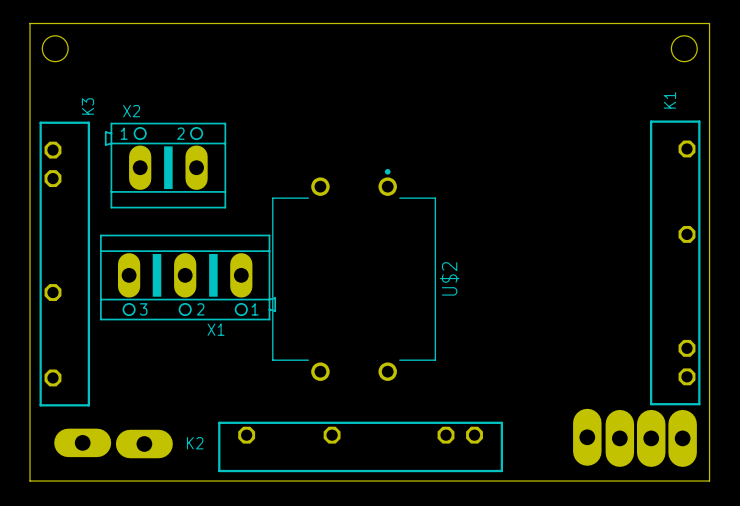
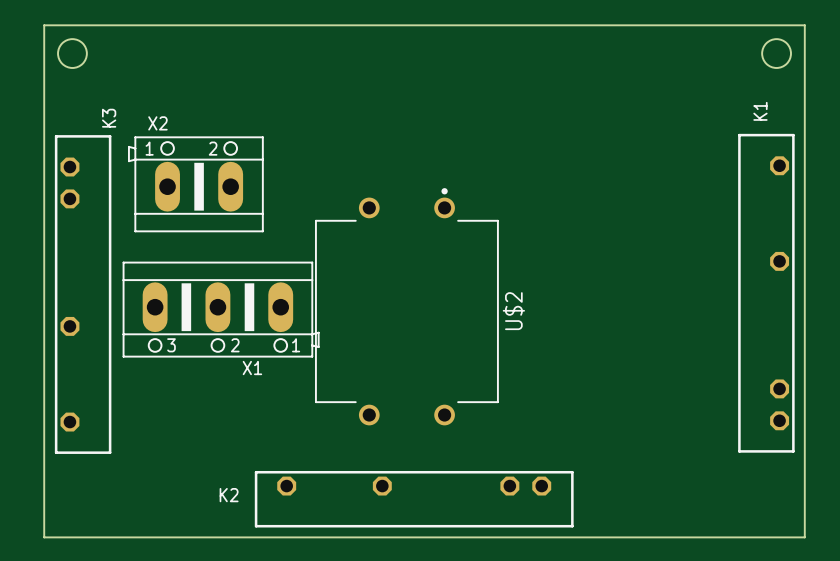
part: (587, 437) -> none
part: (619, 438) -> none
part: (651, 438) -> none
part: (682, 438) -> none
part: (82, 442) -> none
part: (144, 444) -> none

